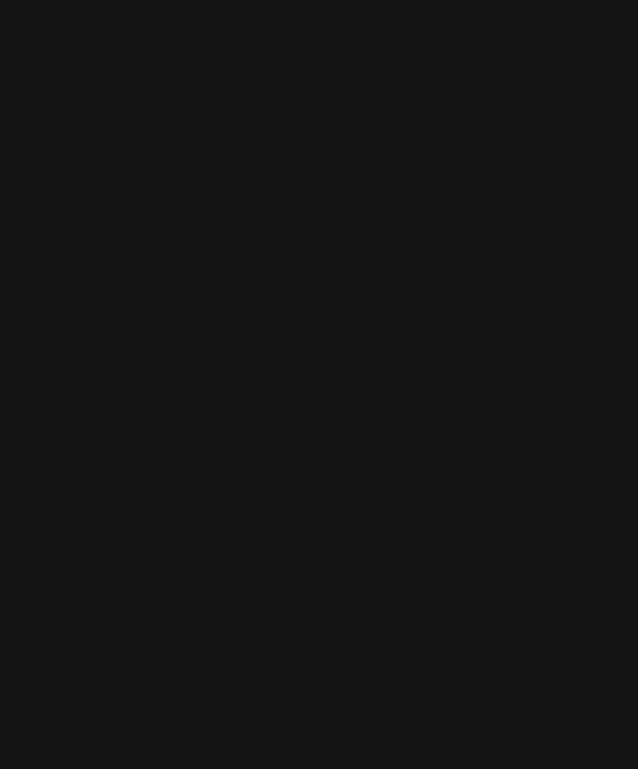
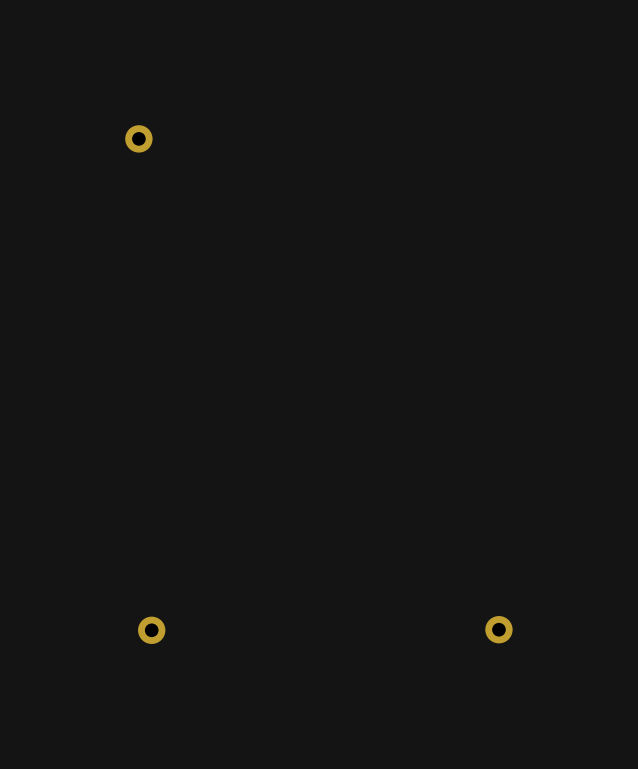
via: none -> (138, 138)
via: none -> (498, 629)
via: none -> (151, 630)

